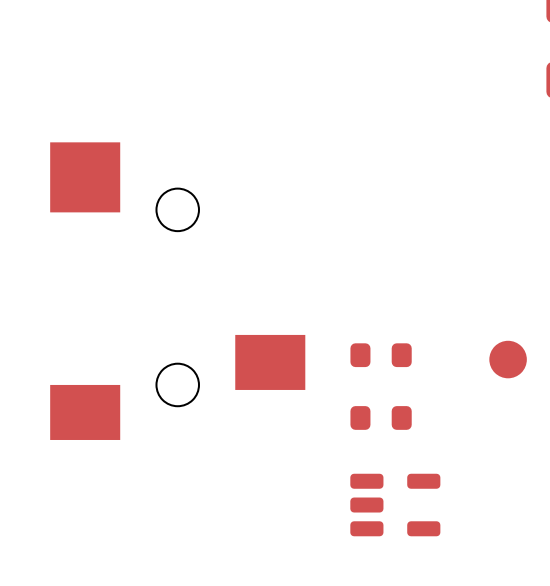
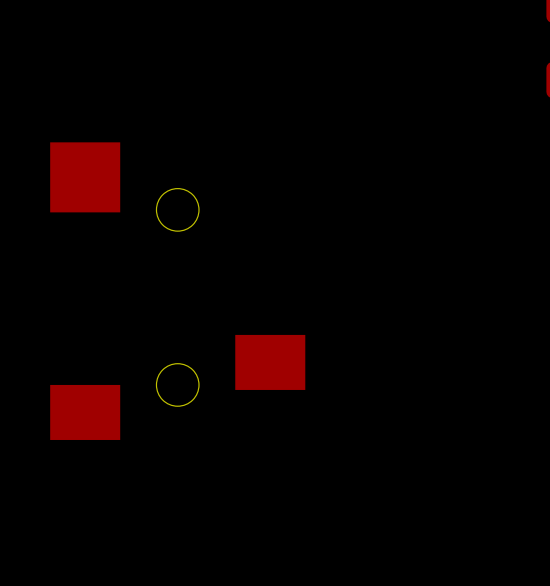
part: (381, 355) -> none
part: (508, 359) -> none
part: (381, 417) -> none
part: (395, 505) -> none

